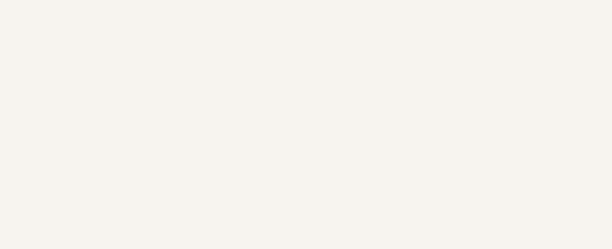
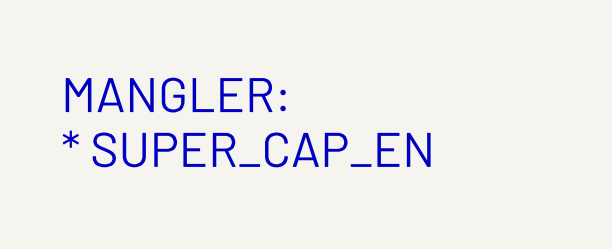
text: none -> MANGLER: (175, 95)
text: none -> * SUPER_CAP_EN (246, 148)

